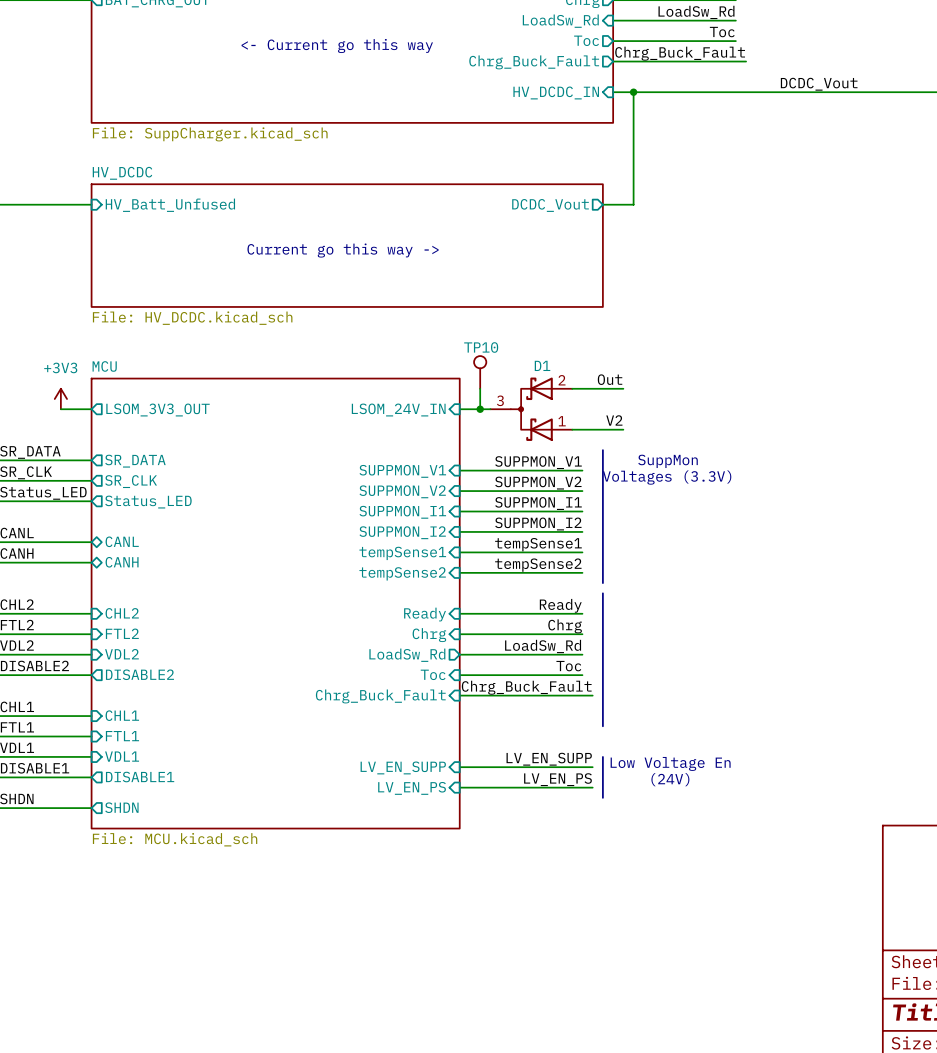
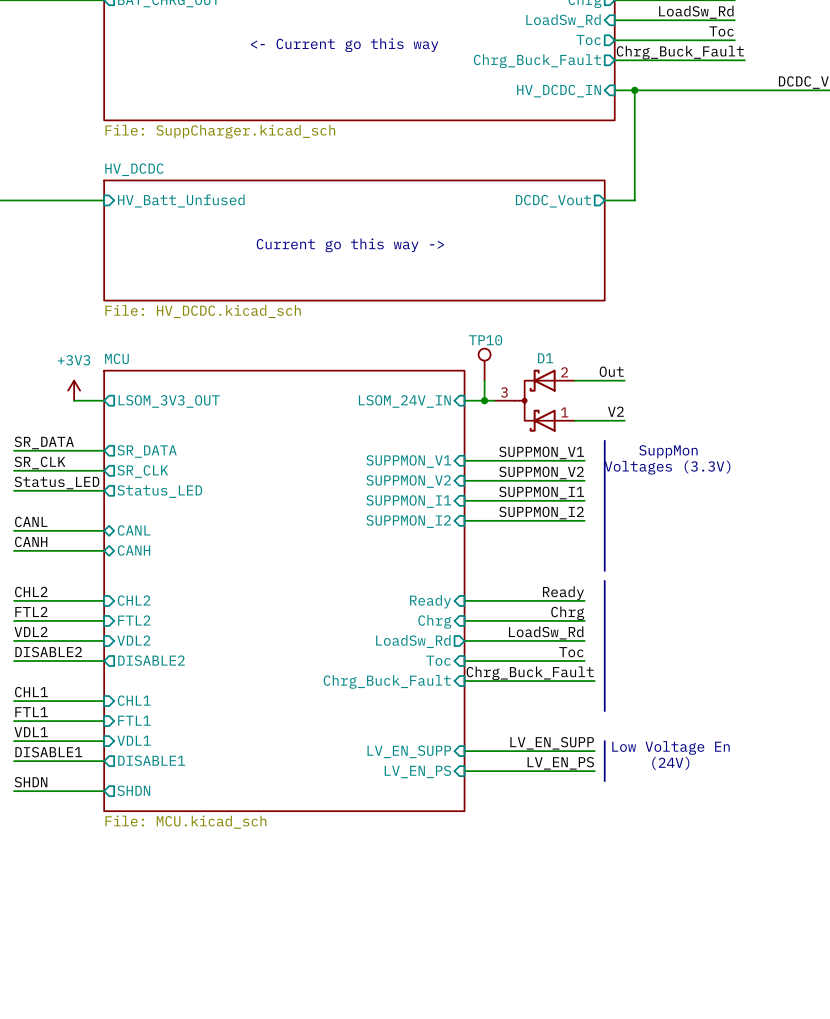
label: tempSense1 (538, 544) -> none
wire: (459, 552) (582, 552) -> none
sheet pin: tempSense1 (402, 553) -> none
label: tempSense2 (538, 565) -> none
wire: (459, 572) (582, 572) -> none
sheet pin: tempSense2 (402, 573) -> none

